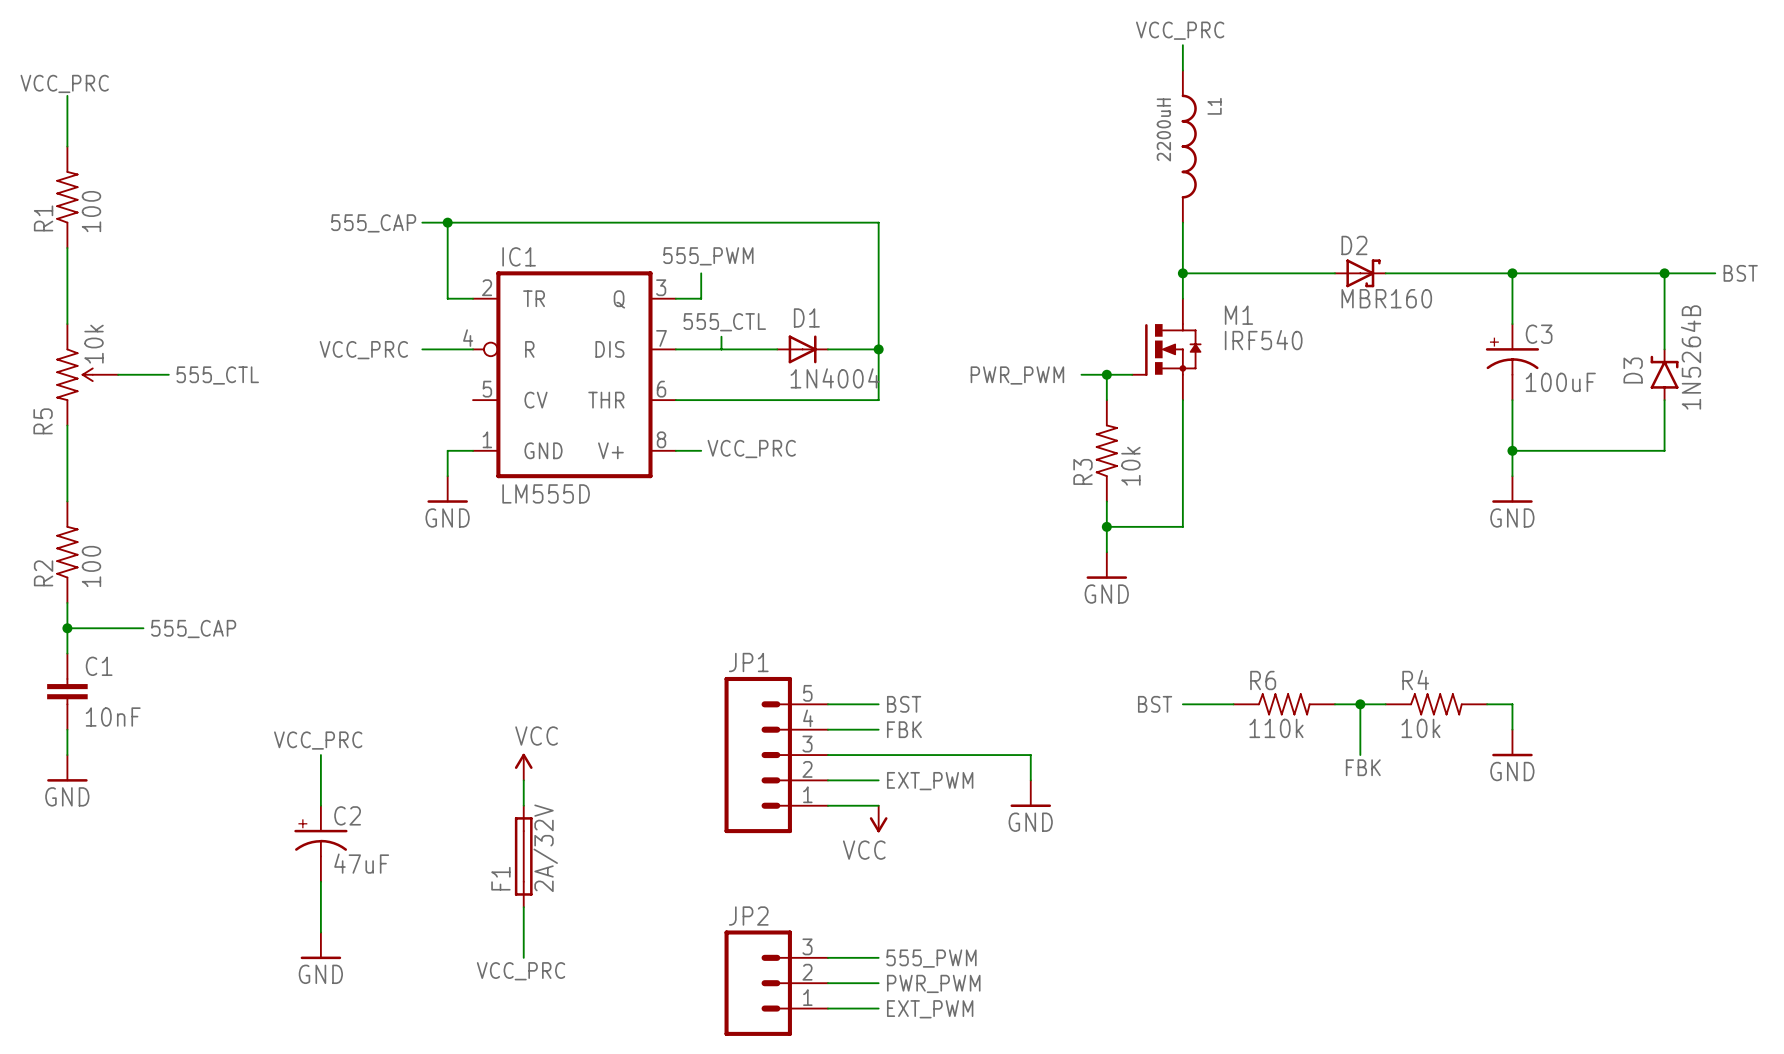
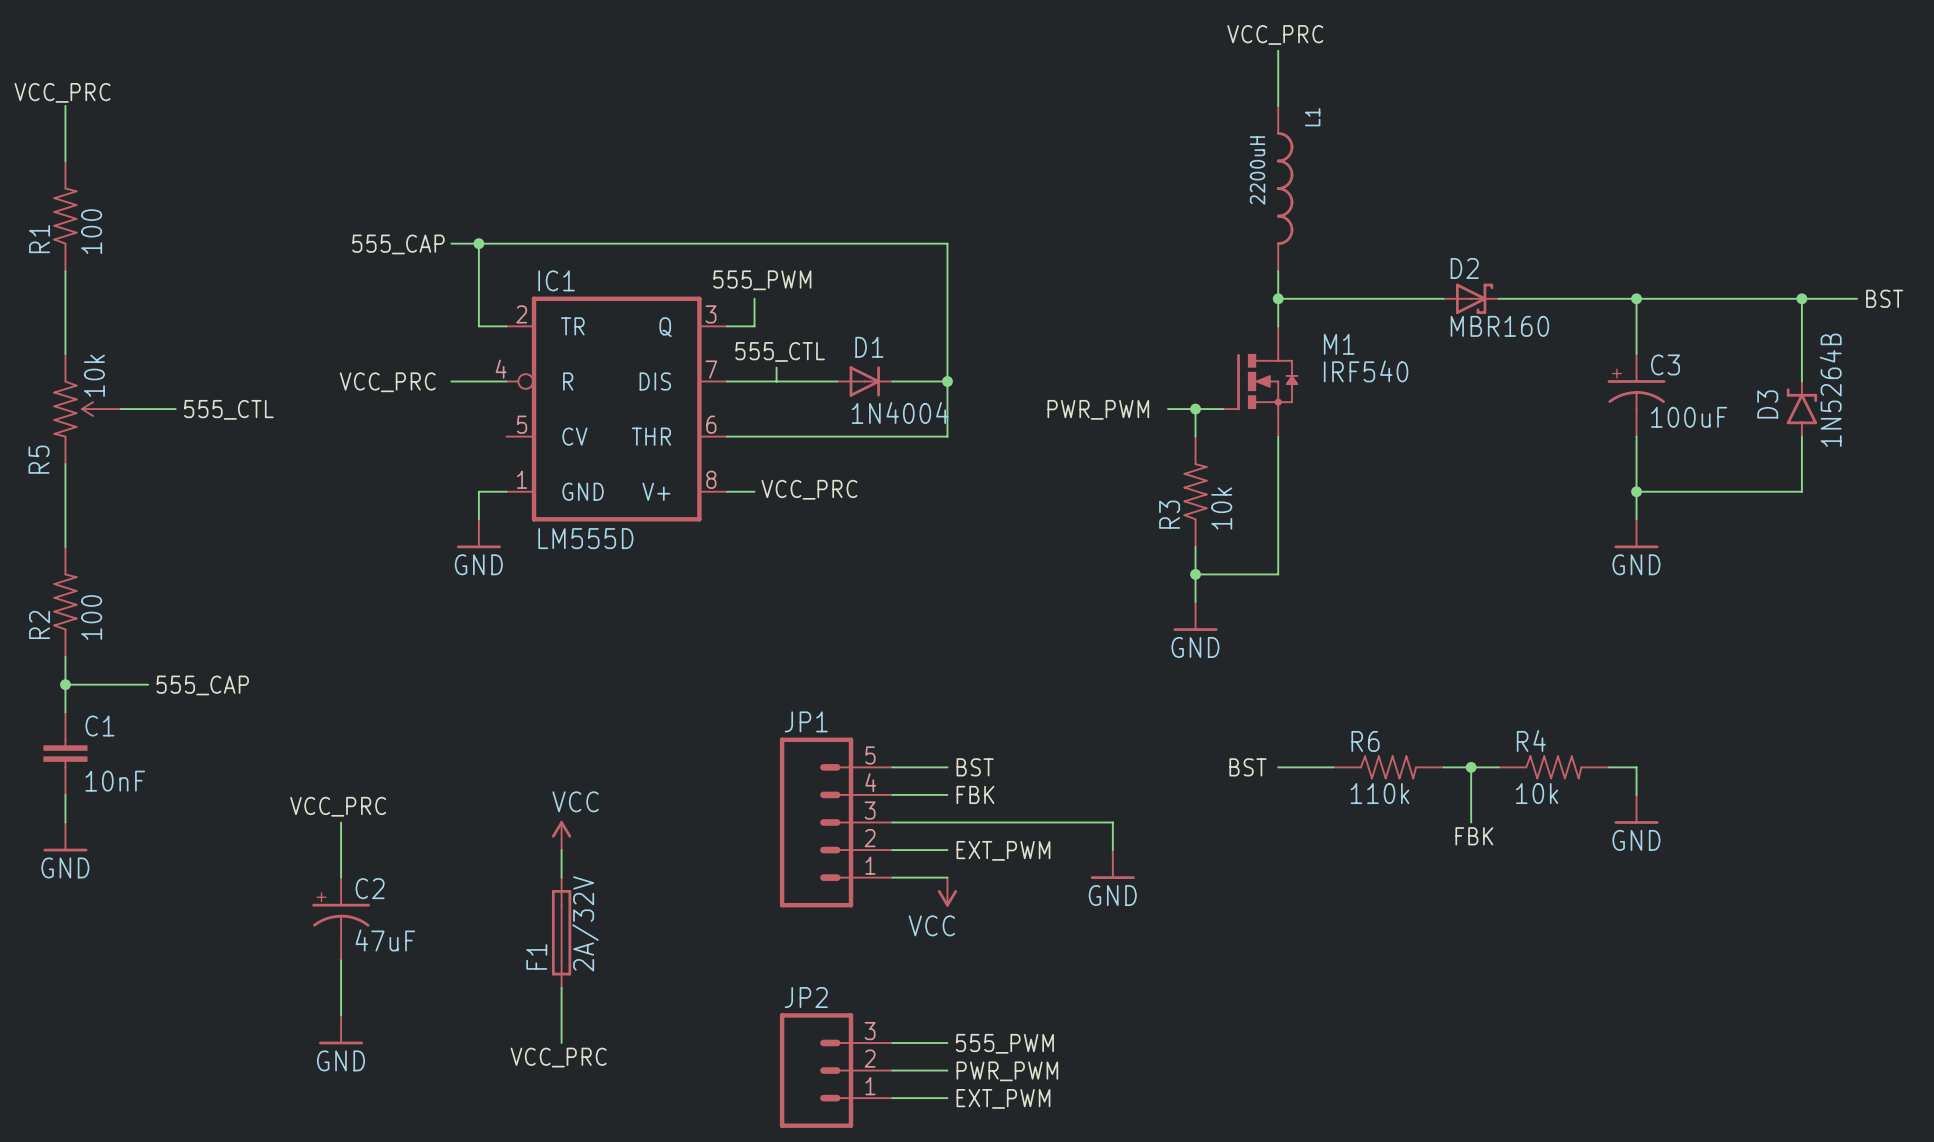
L1 position: (1189, 146) -> (1285, 188)

